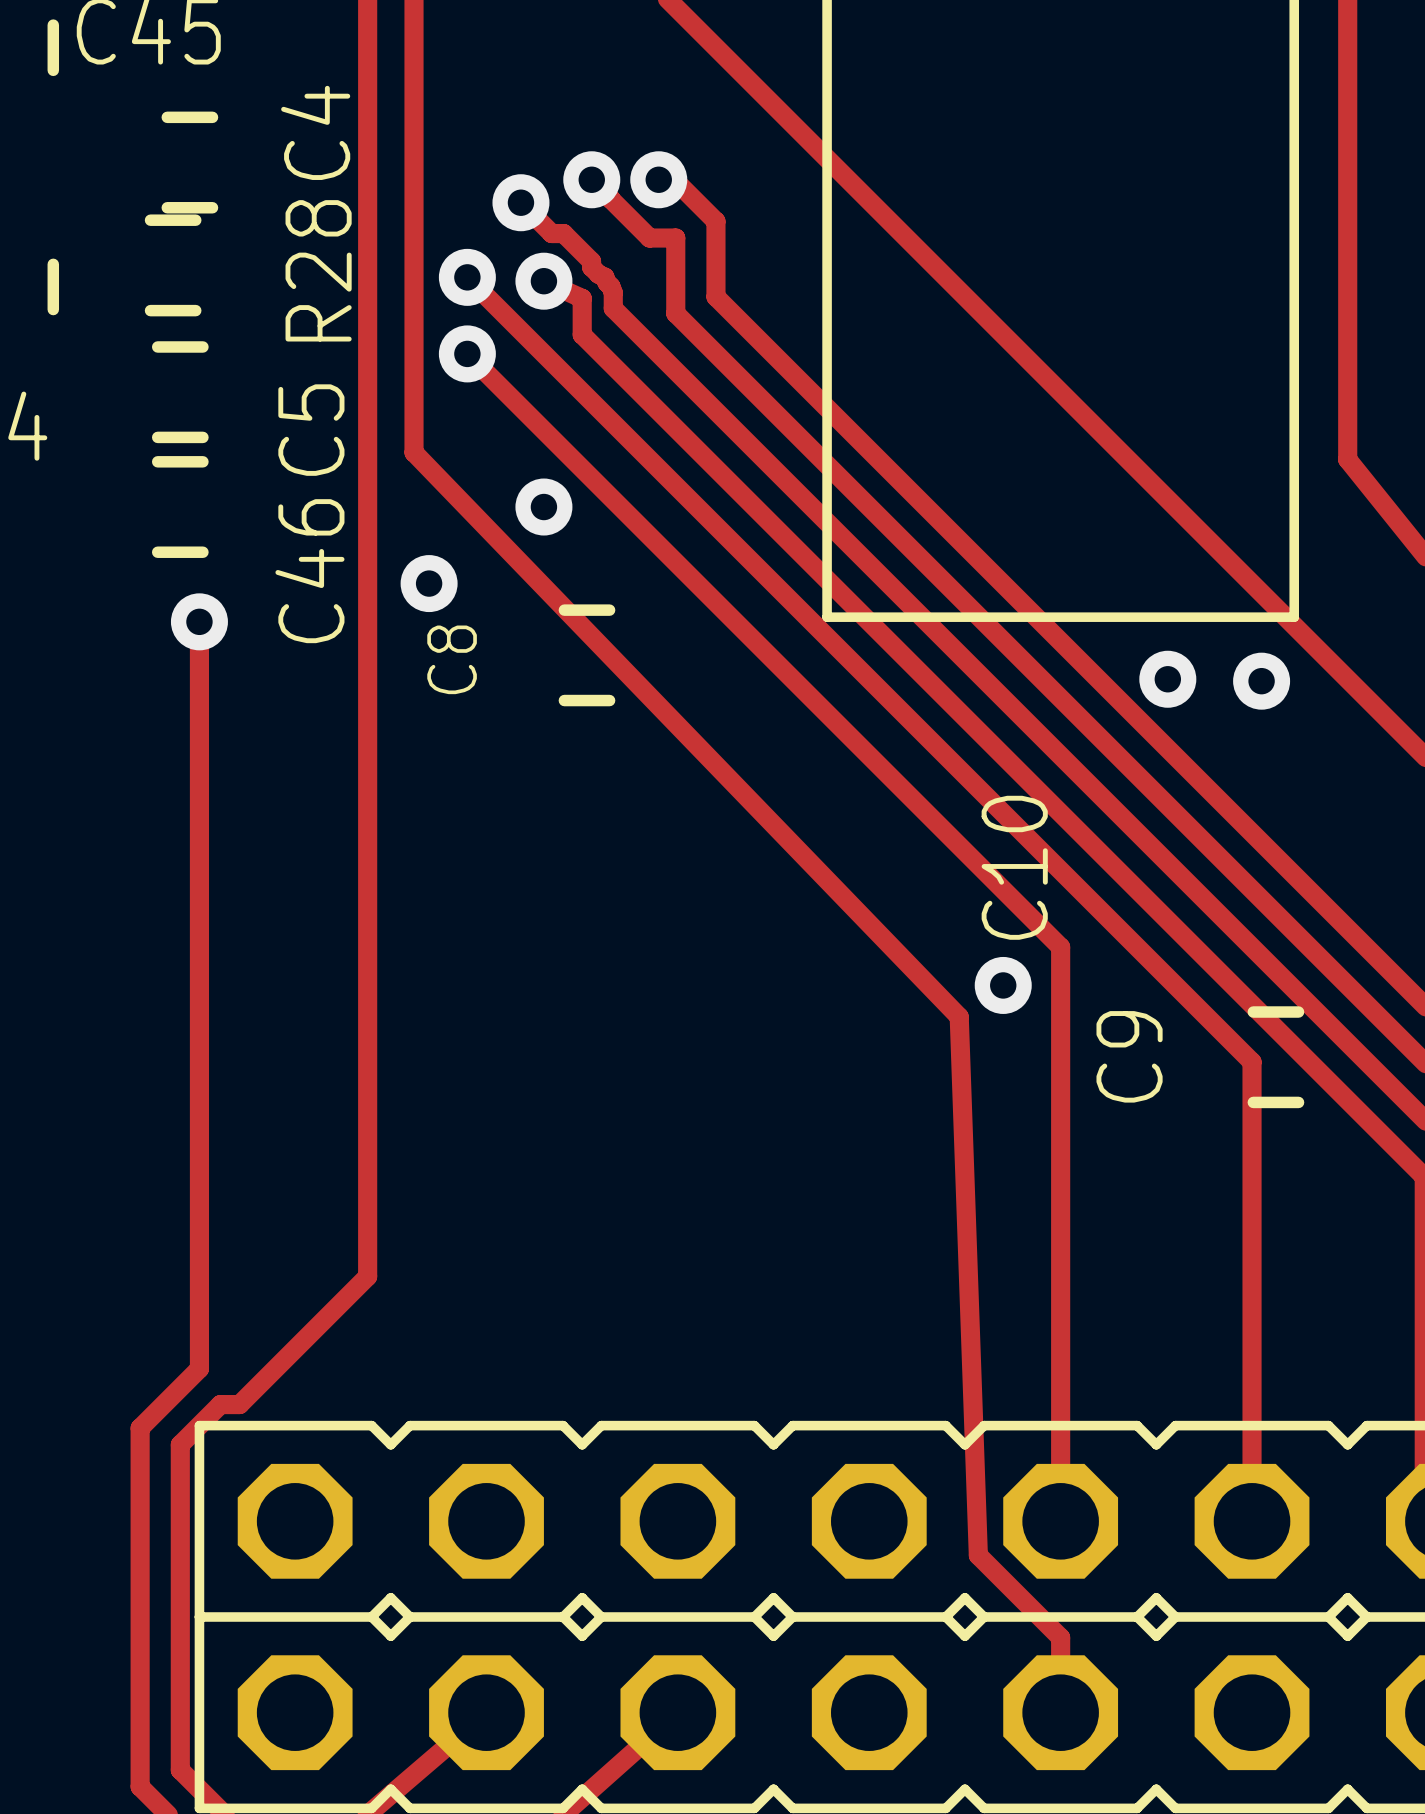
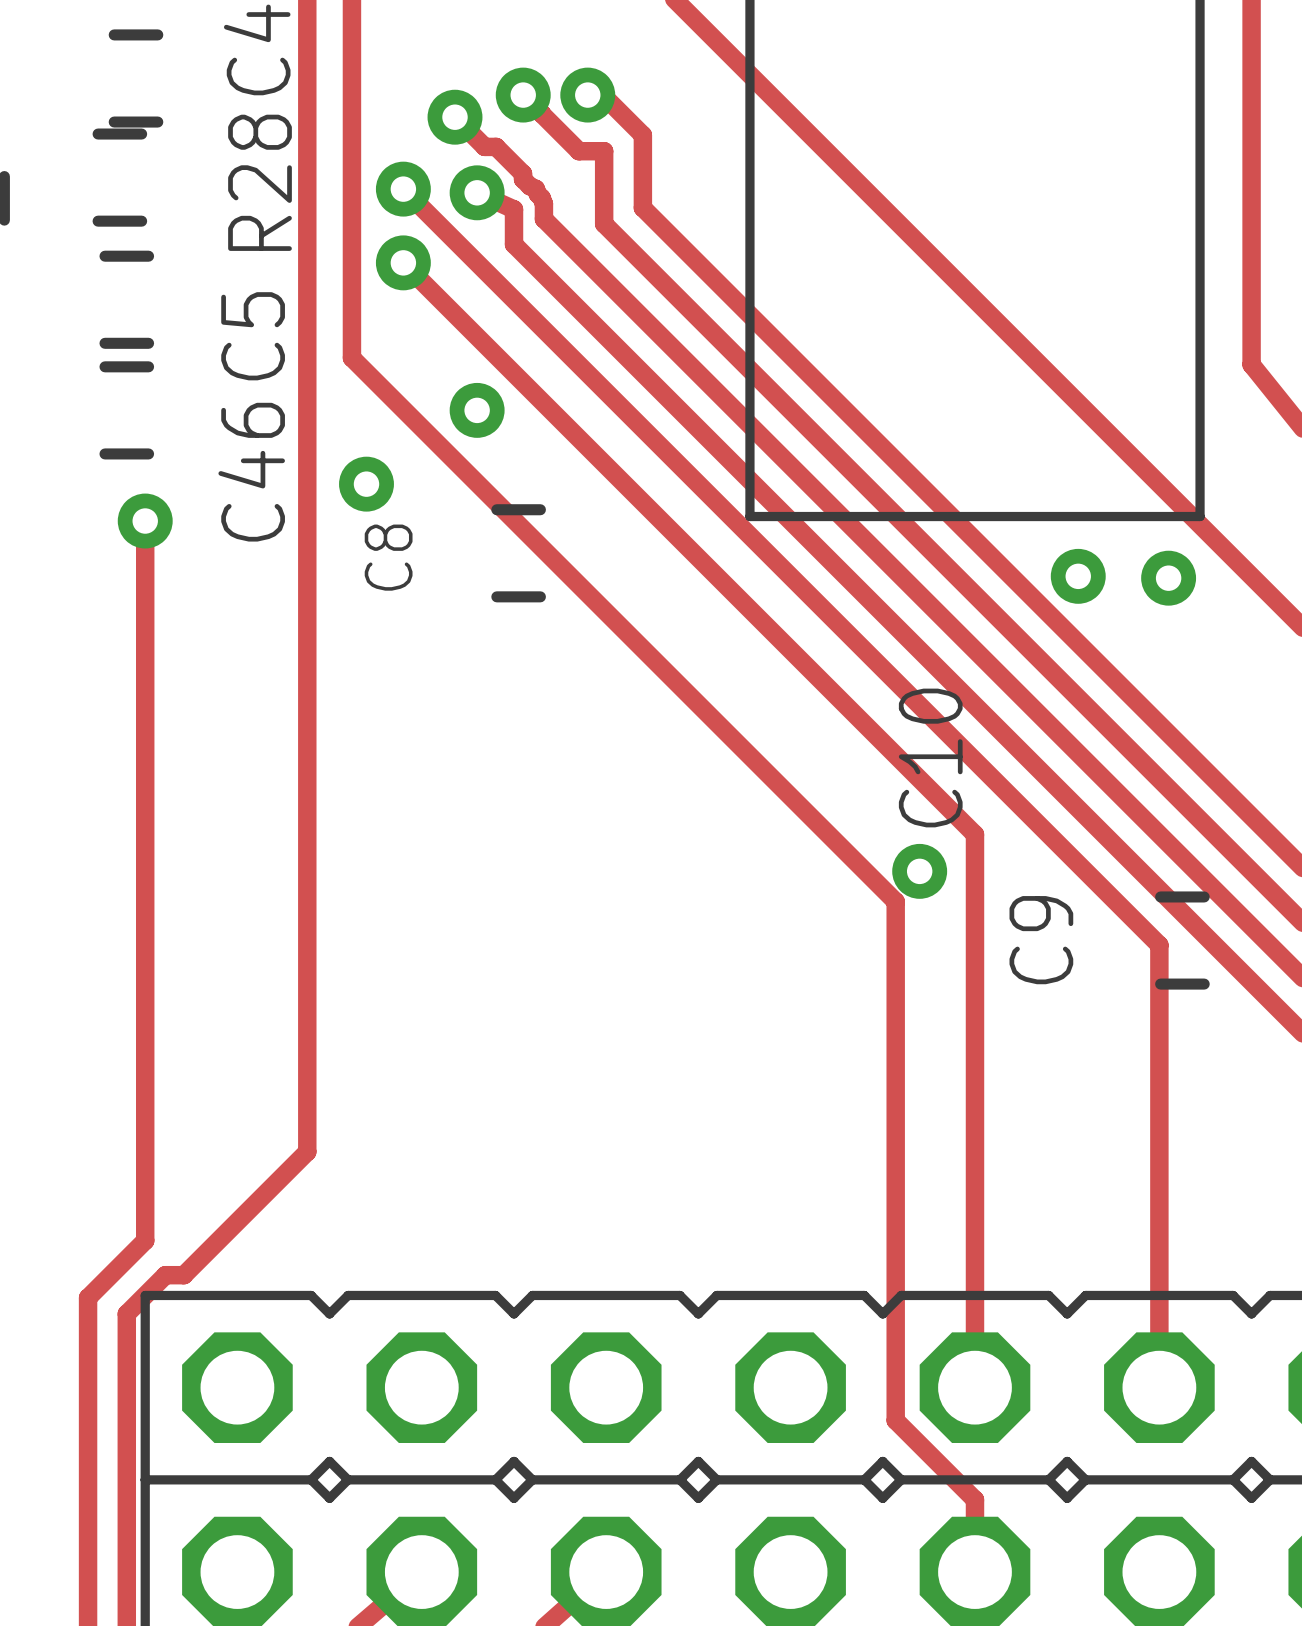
track: (414, 452) (959, 1016) (978, 1555) -> (351, 357) (895, 901) (895, 1420)

